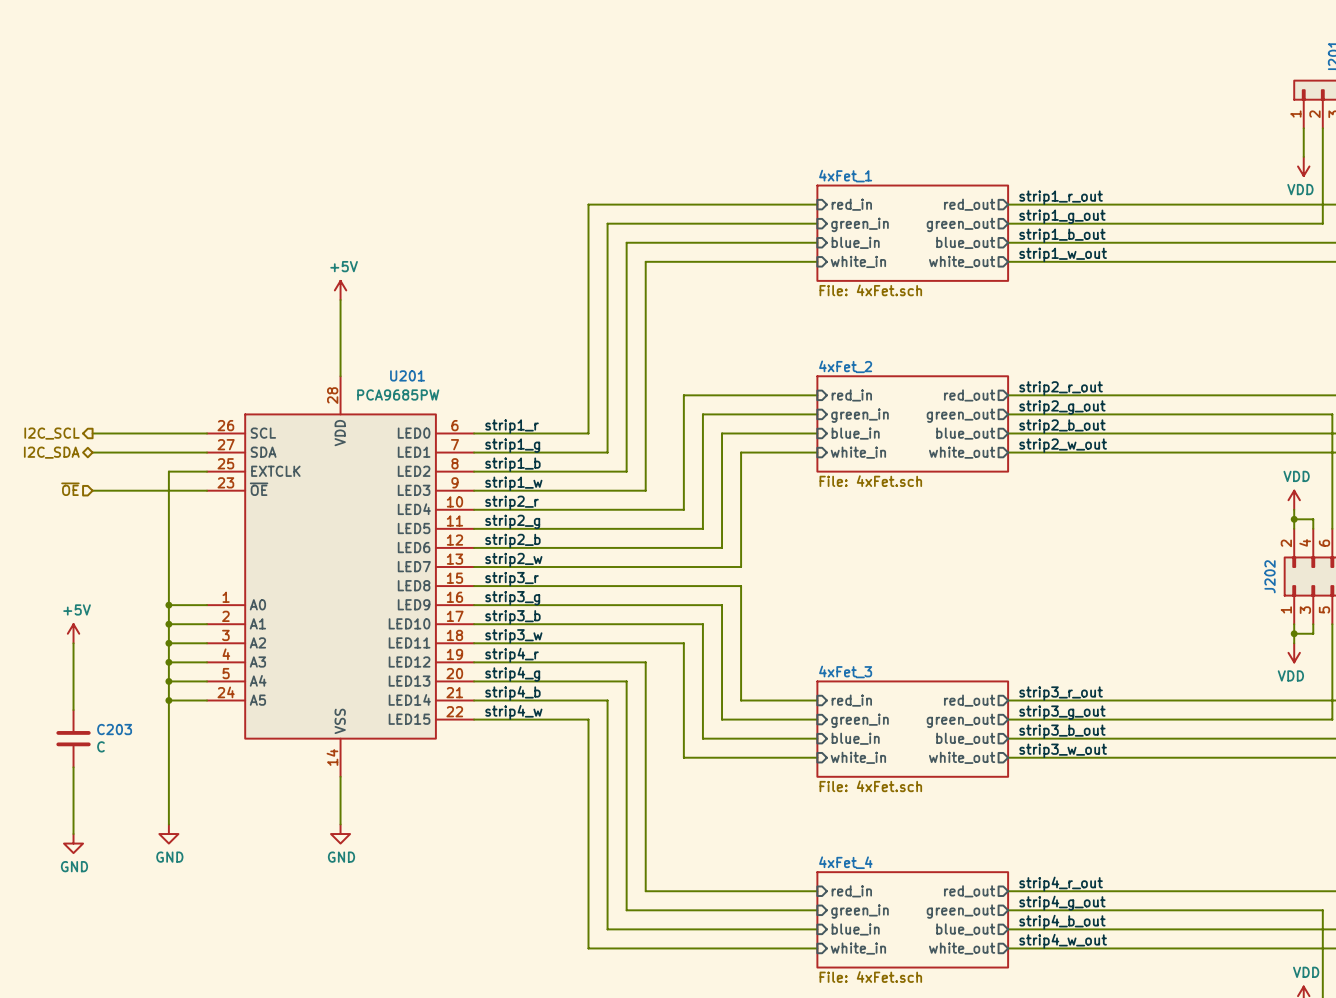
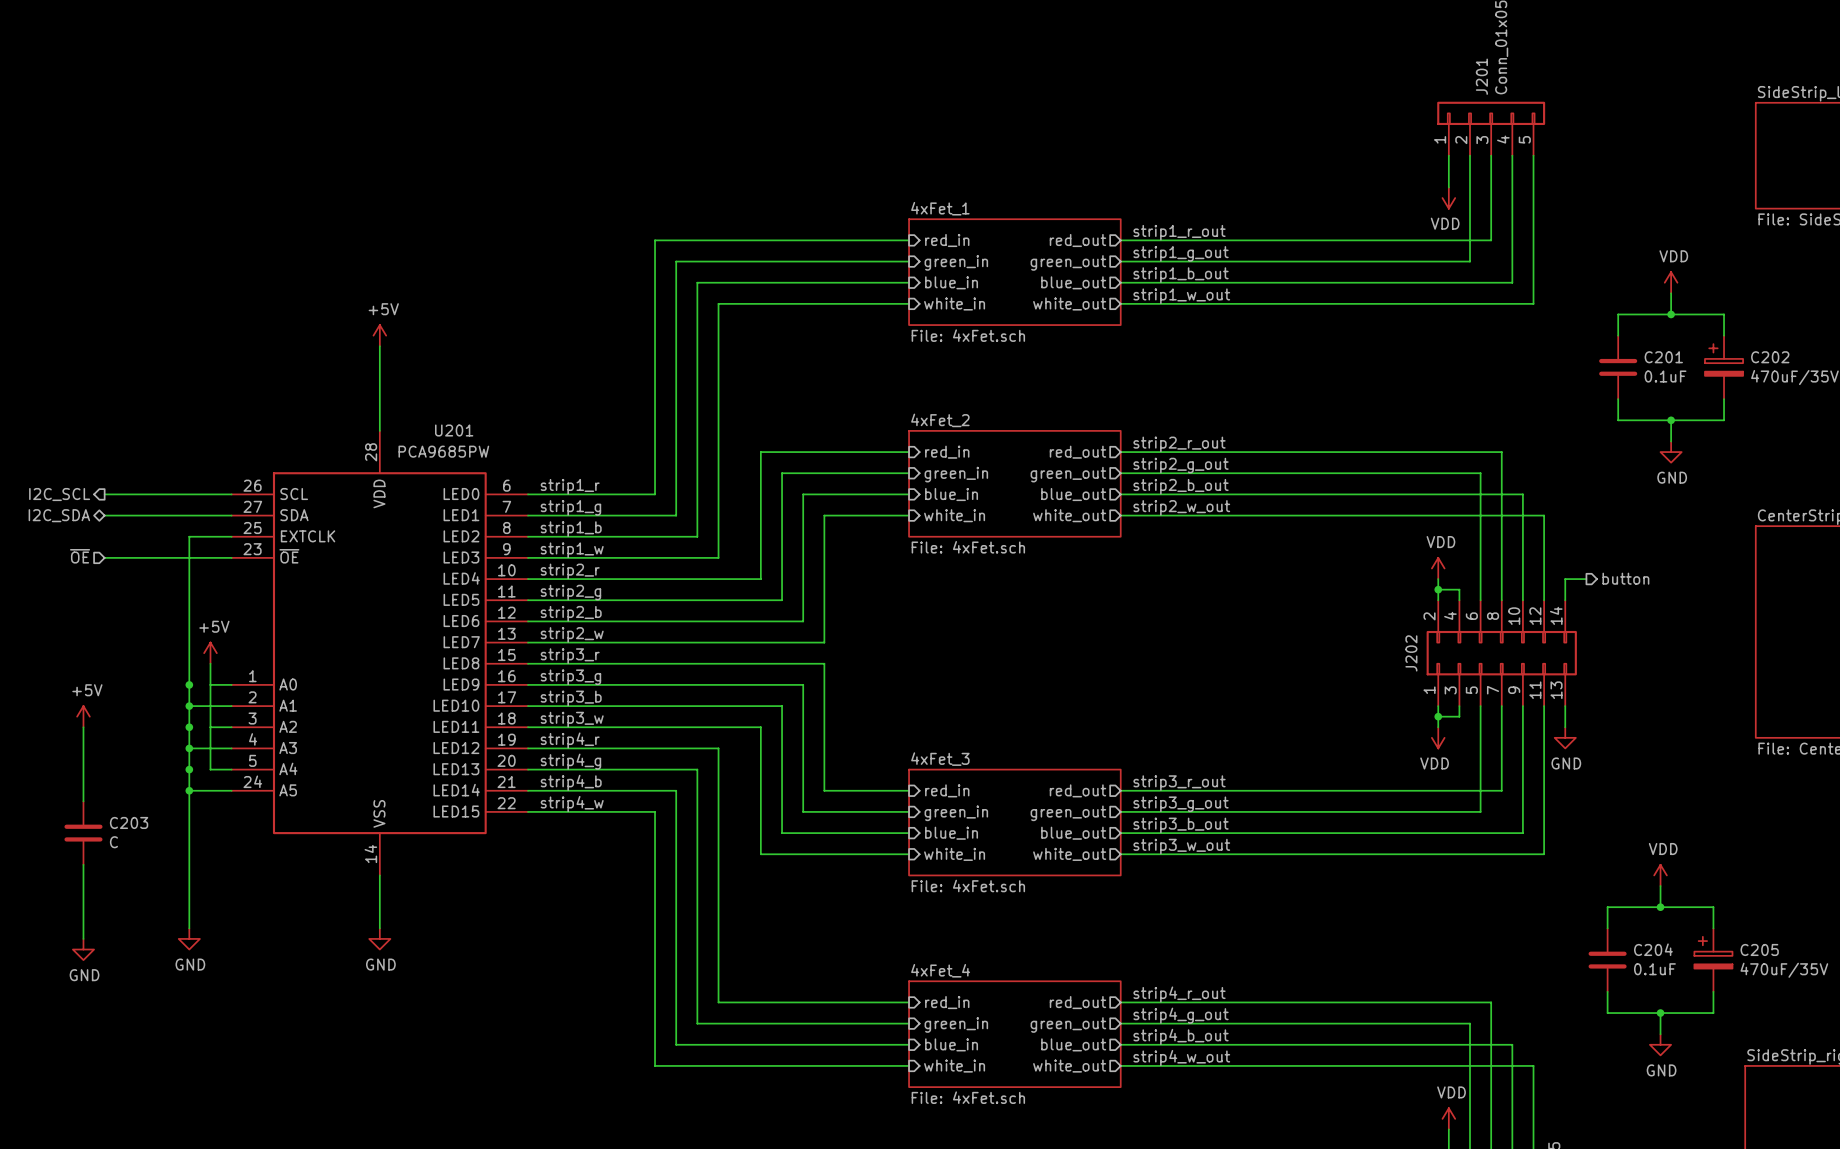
power symbol: none -> +5V (210, 653)
wire: (168, 605) (187, 605) -> none
wire: (168, 643) (187, 643) -> none
wire: (168, 681) (187, 681) -> (210, 663) (210, 769)

